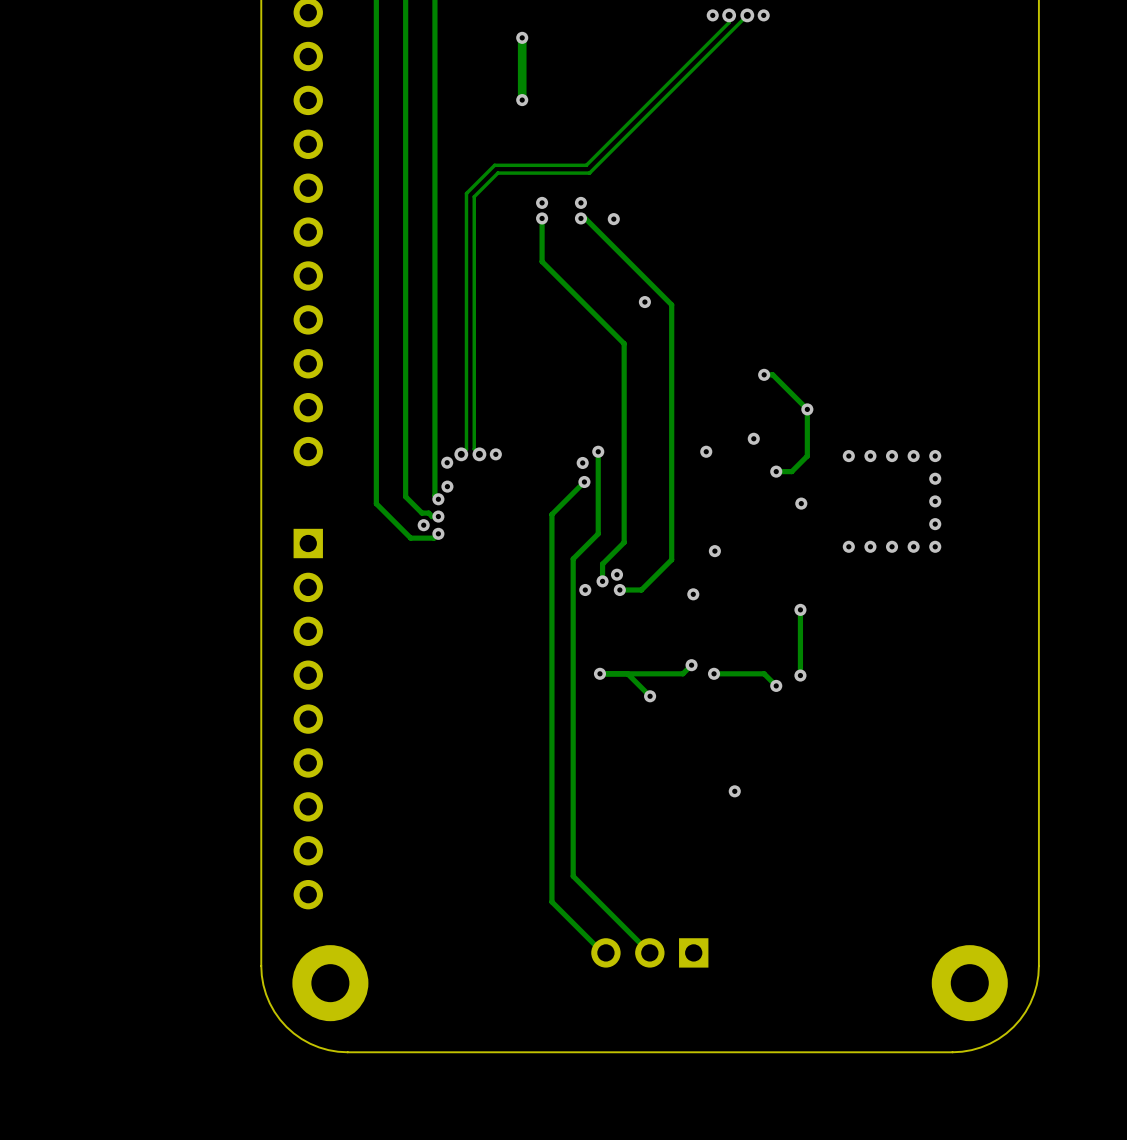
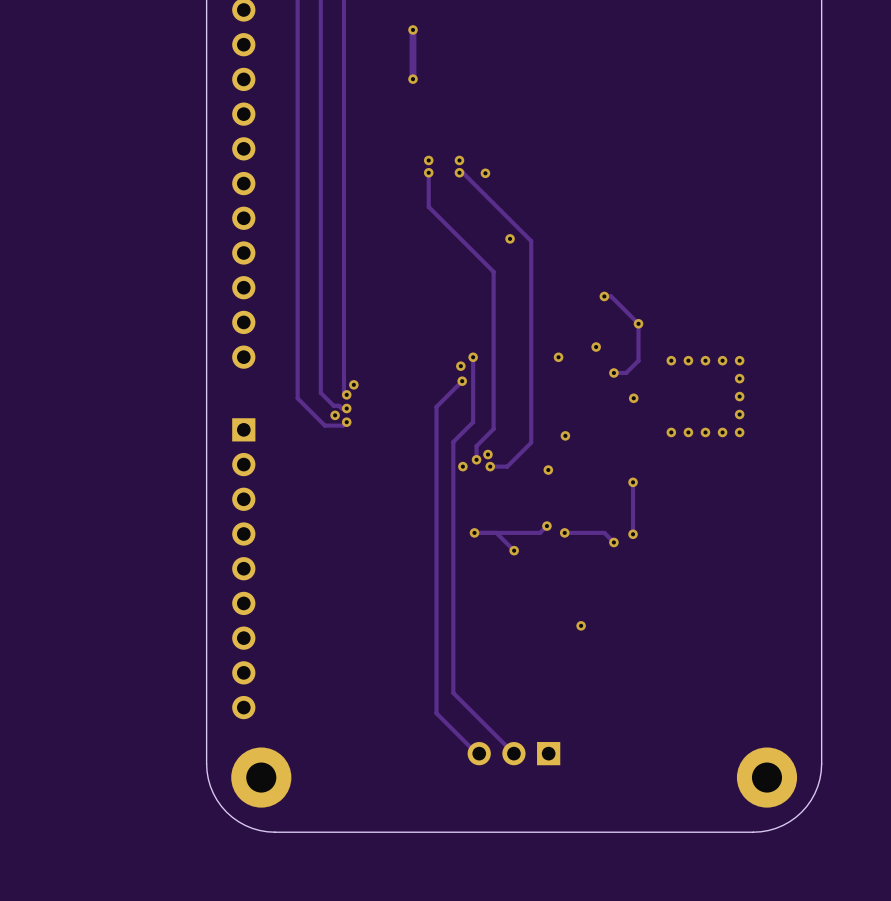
via: (712, 15) -> none
track: (729, 15) (729, 22) (586, 165) (494, 165) (466, 193) (466, 449) (461, 454) -> none
via: (729, 15) -> none
track: (747, 15) (589, 173) (497, 173) (474, 196) (474, 449) (479, 454) -> none
via: (747, 15) -> none
via: (763, 15) -> none
via: (461, 454) -> none
via: (479, 454) -> none
via: (495, 454) -> none
via: (447, 462) -> none

